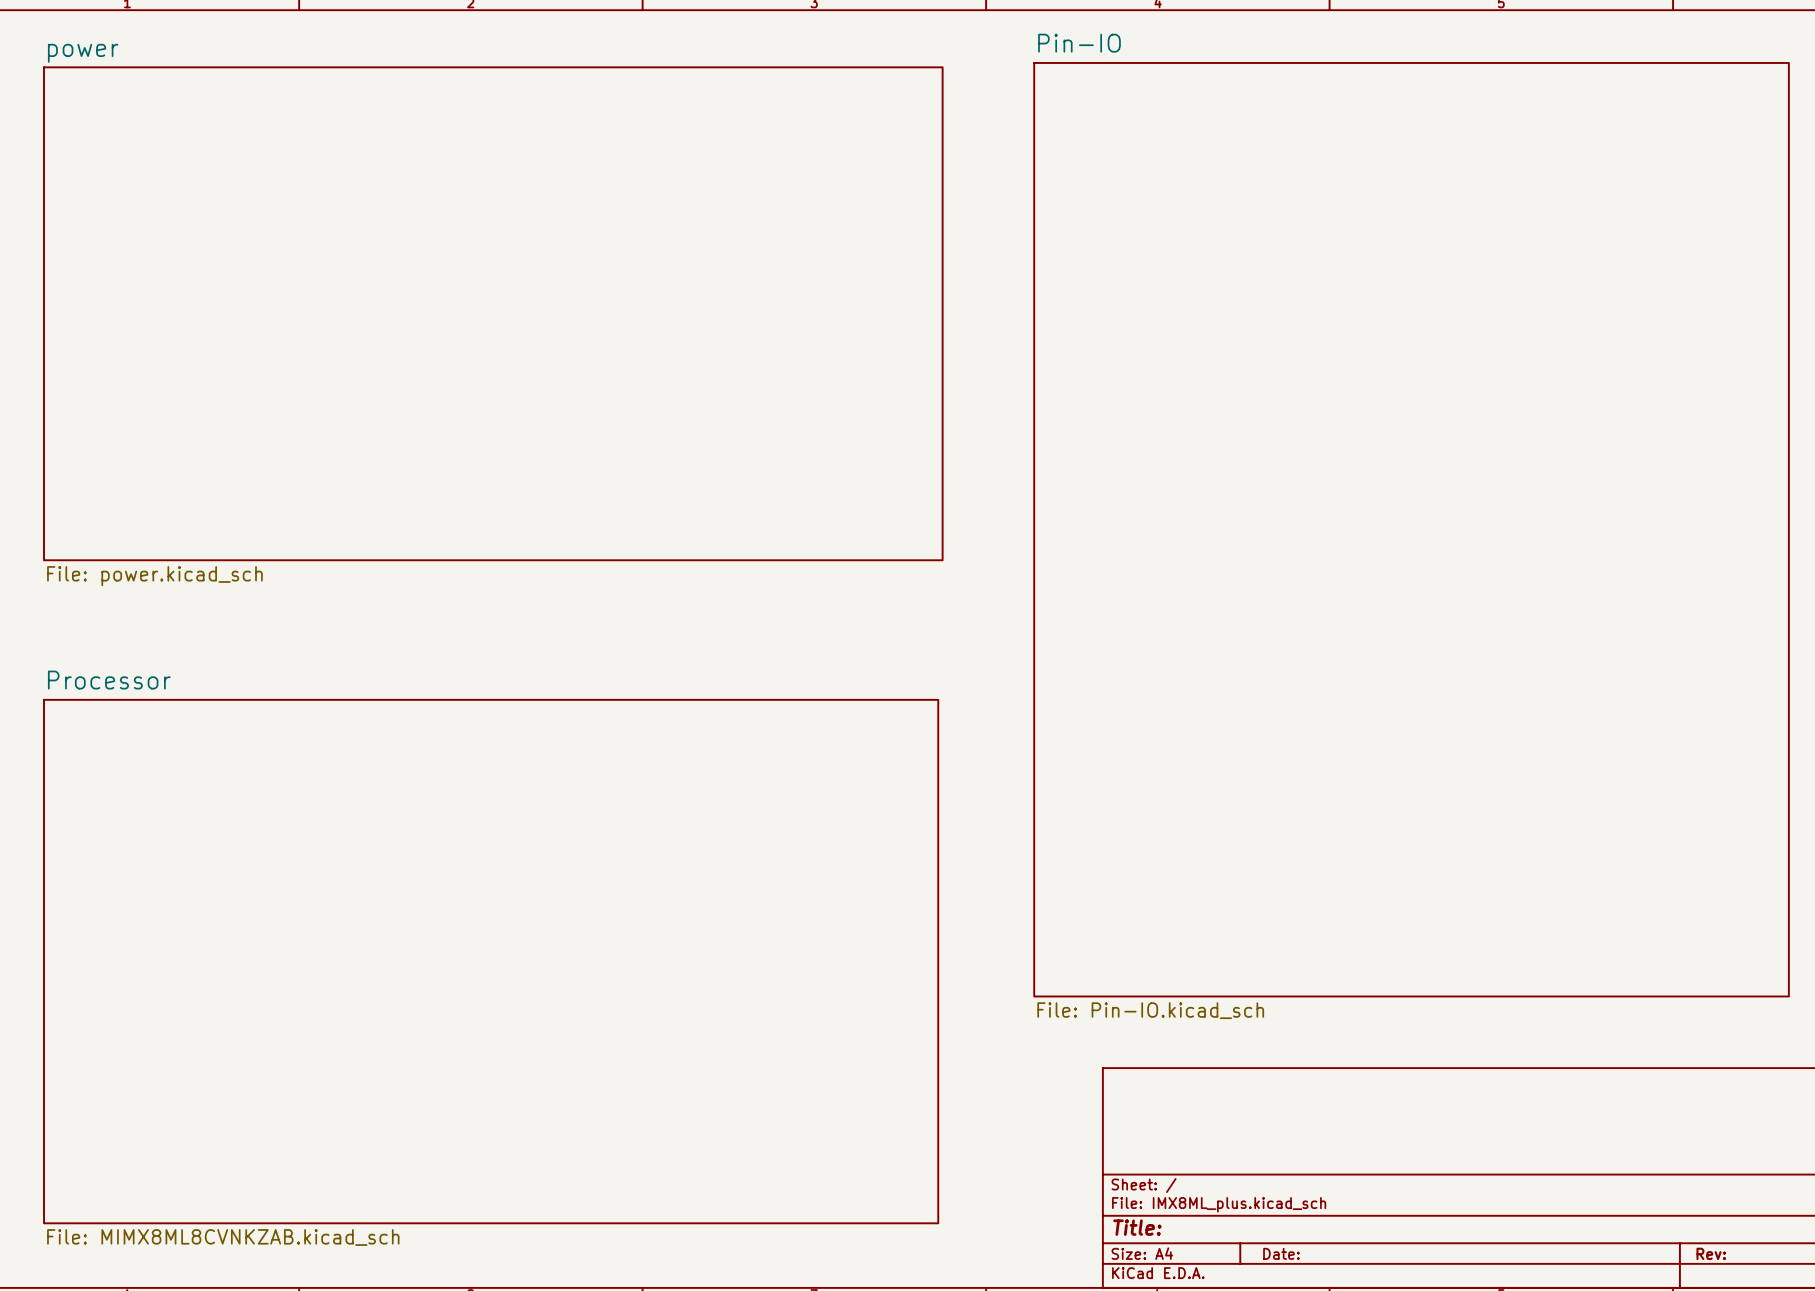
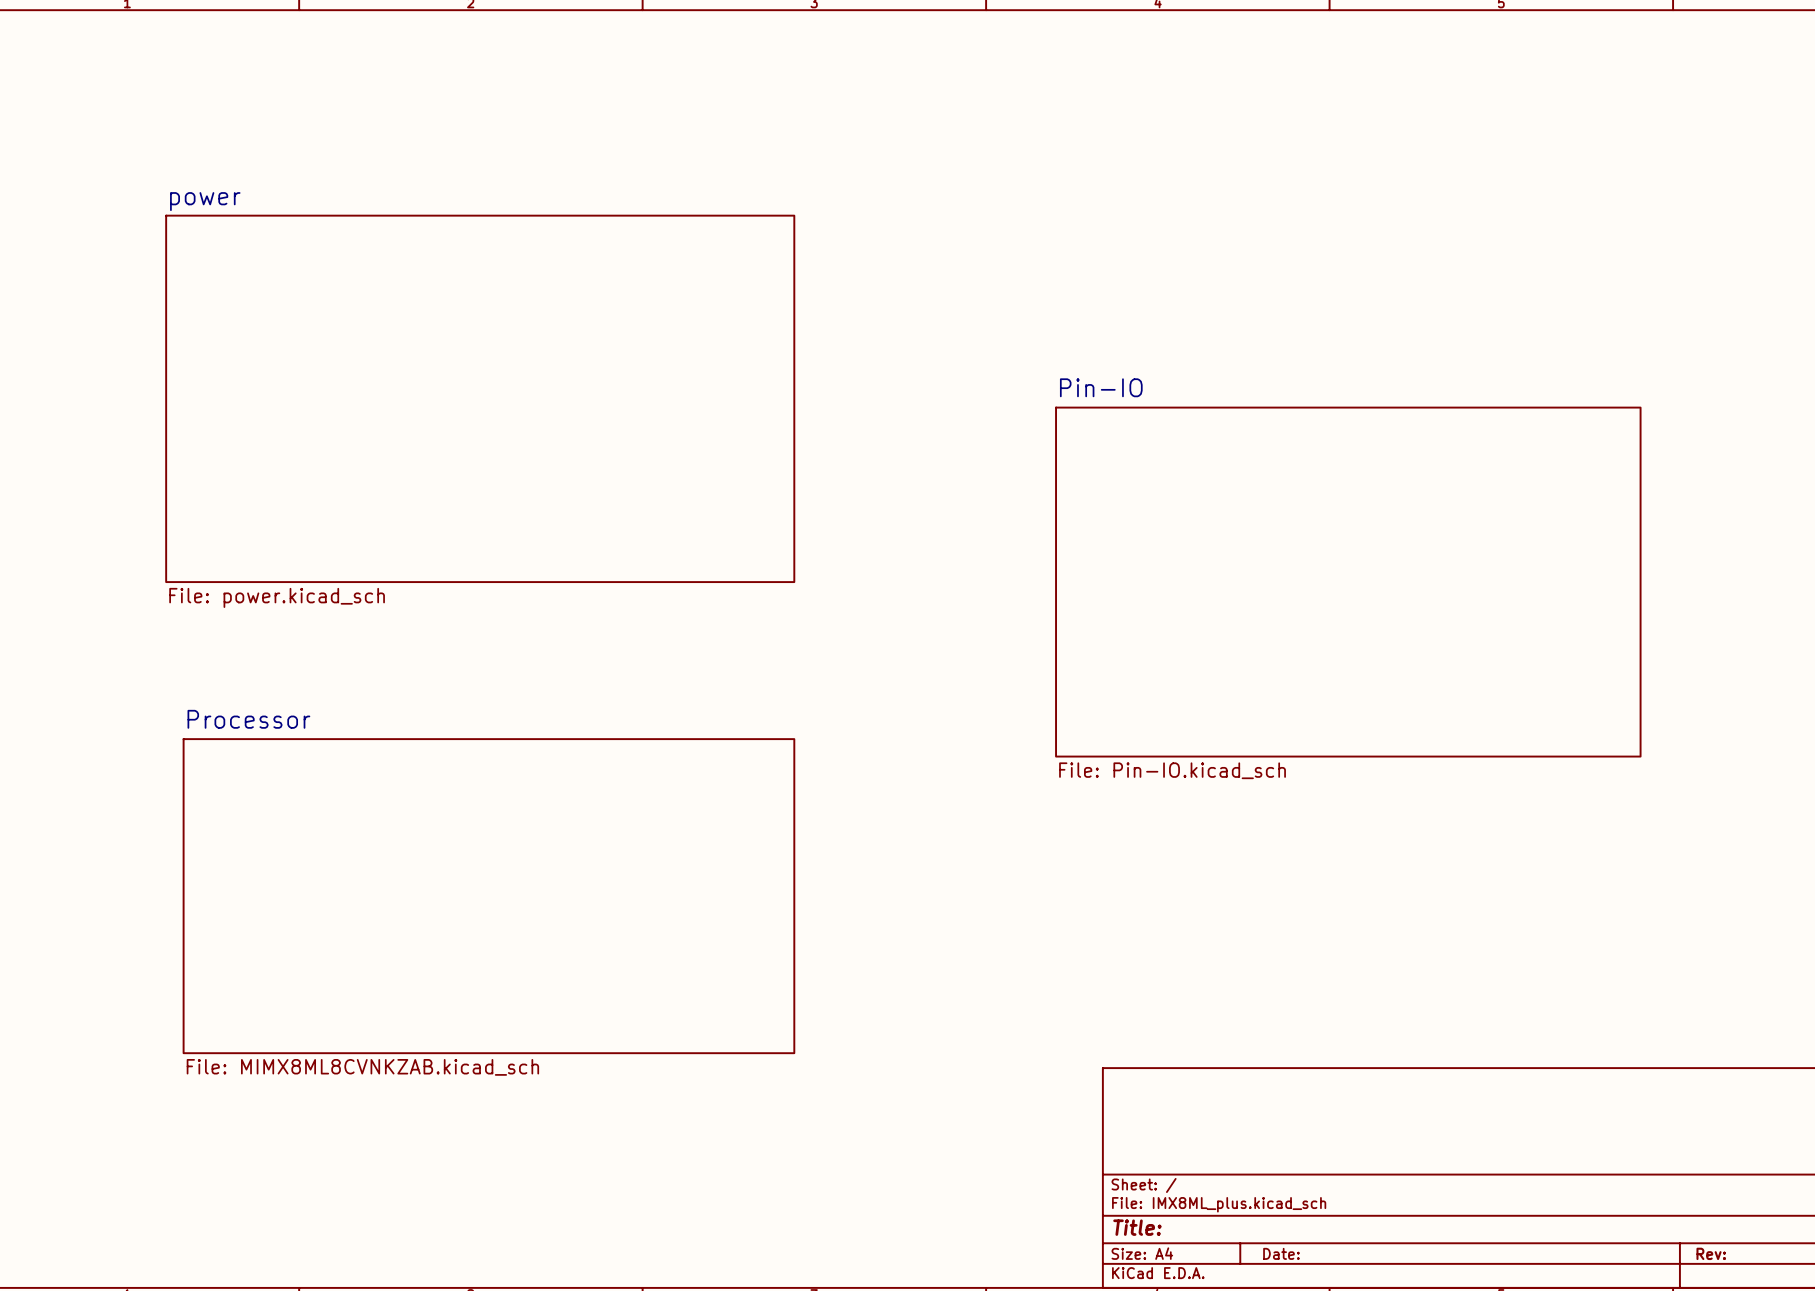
sheet power: File: power.kicad_sch (493, 313) -> none
sheet power: none -> File: power.kicad_sch (480, 398)
sheet Pin-IO: File: Pin-IO.kicad_sch (1411, 529) -> none
sheet Pin-IO: none -> File: Pin-IO.kicad_sch (1348, 582)
sheet Processor: none -> File: MIMX8ML8CVNKZAB.kicad_sch (488, 896)
sheet Processor: File: MIMX8ML8CVNKZAB.kicad_sch (491, 961) -> none

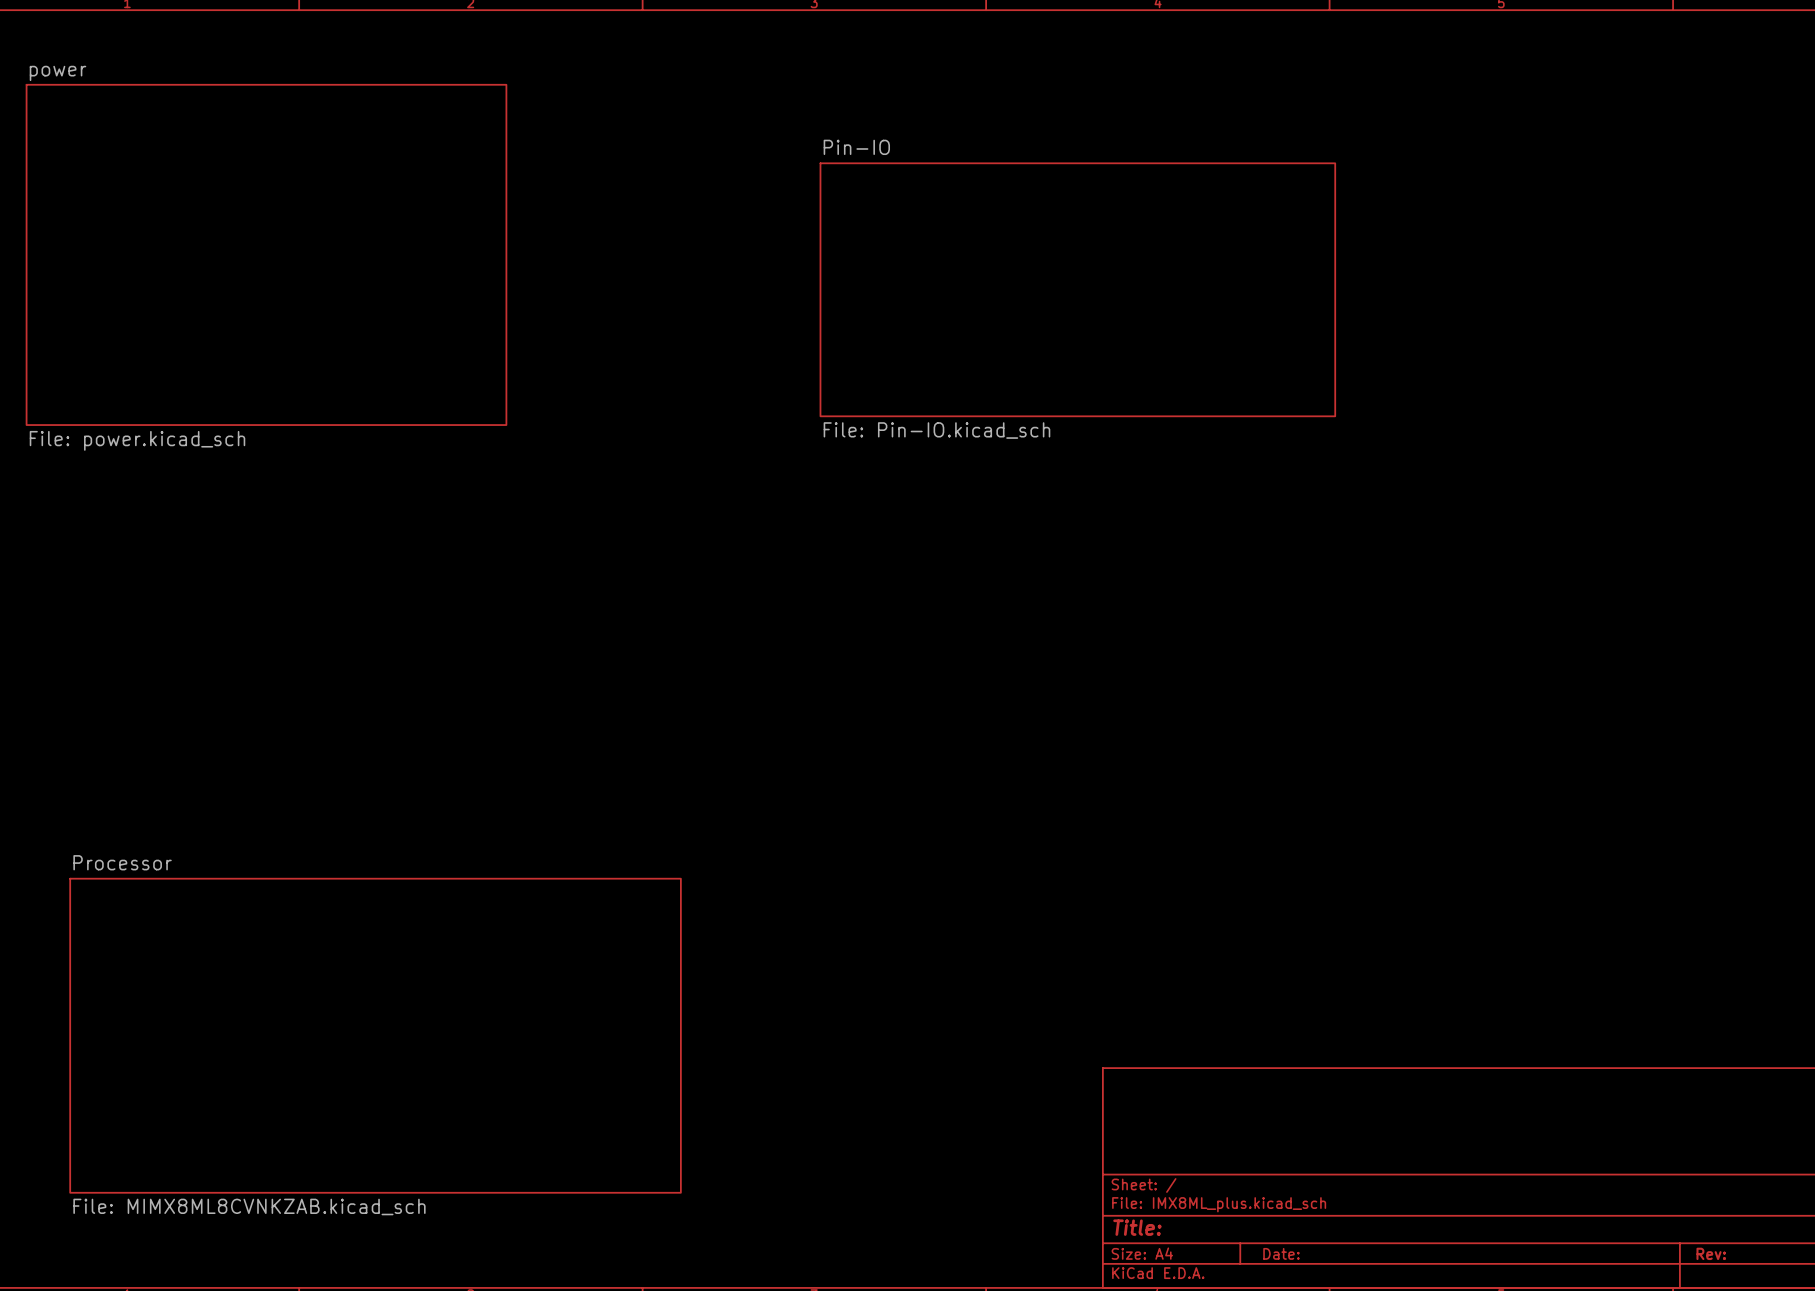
sheet power: none -> File: power.kicad_sch (266, 254)
sheet Pin-IO: none -> File: Pin-IO.kicad_sch (1077, 289)
sheet power: File: power.kicad_sch (480, 398) -> none
sheet Pin-IO: File: Pin-IO.kicad_sch (1348, 582) -> none
sheet Processor: File: MIMX8ML8CVNKZAB.kicad_sch (488, 896) -> none
sheet Processor: none -> File: MIMX8ML8CVNKZAB.kicad_sch (375, 1035)

